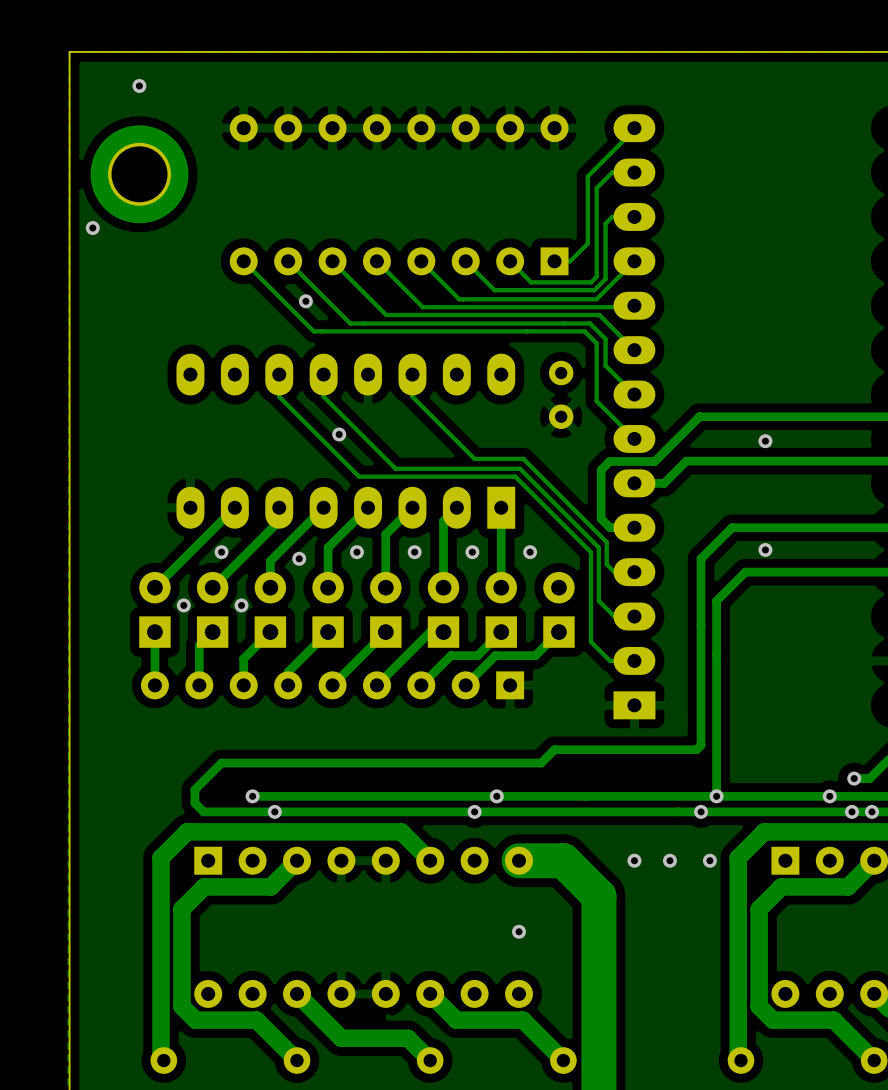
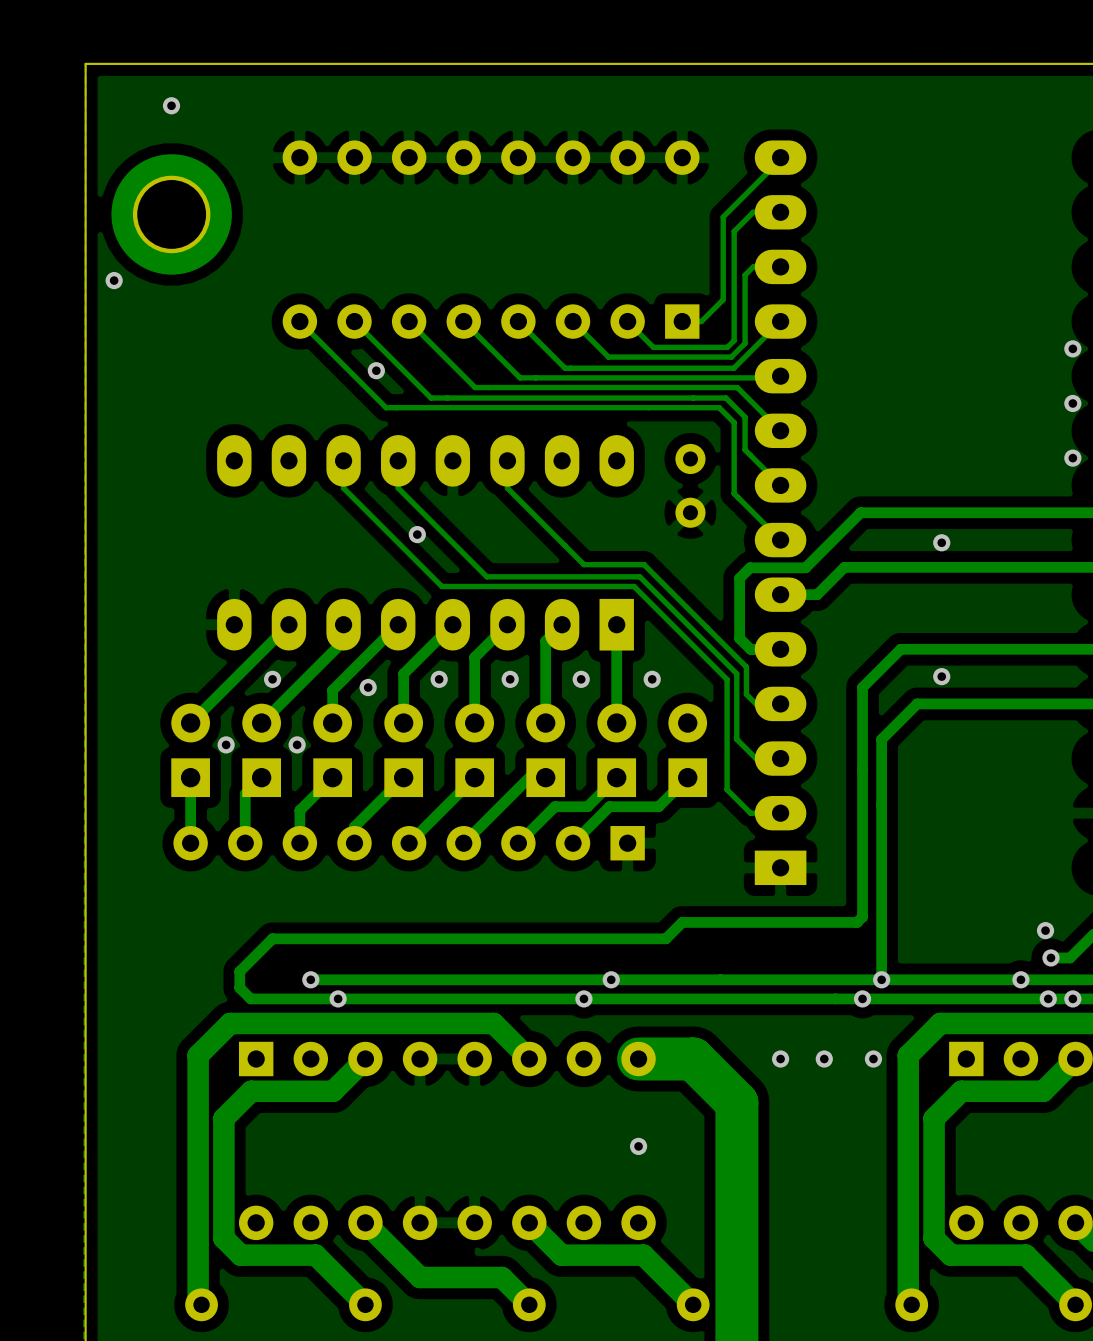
via: none -> (1072, 348)
via: none -> (1072, 403)
via: none -> (1072, 458)
via: none -> (1045, 930)

